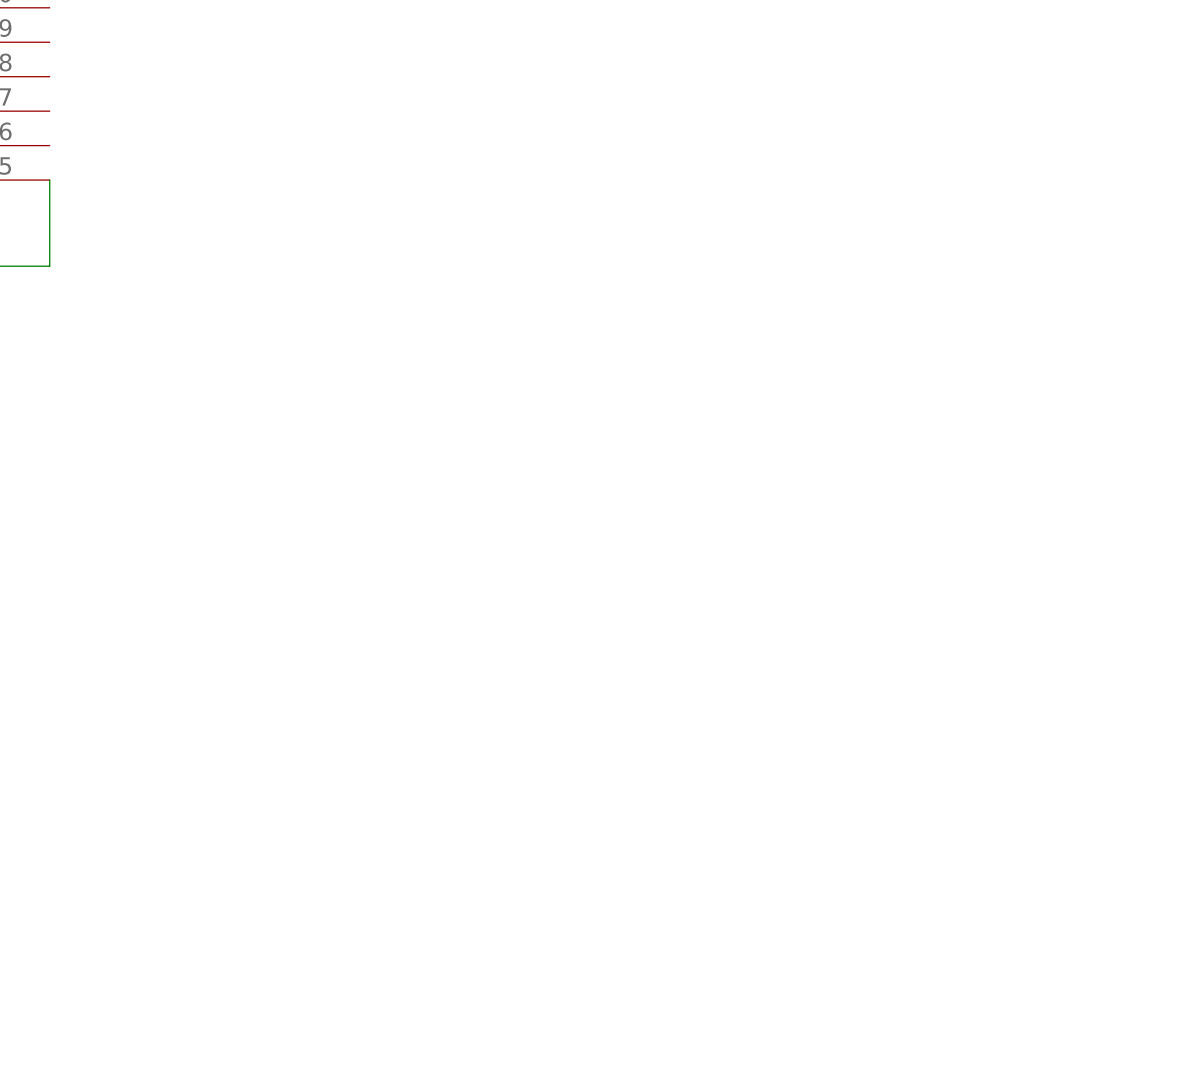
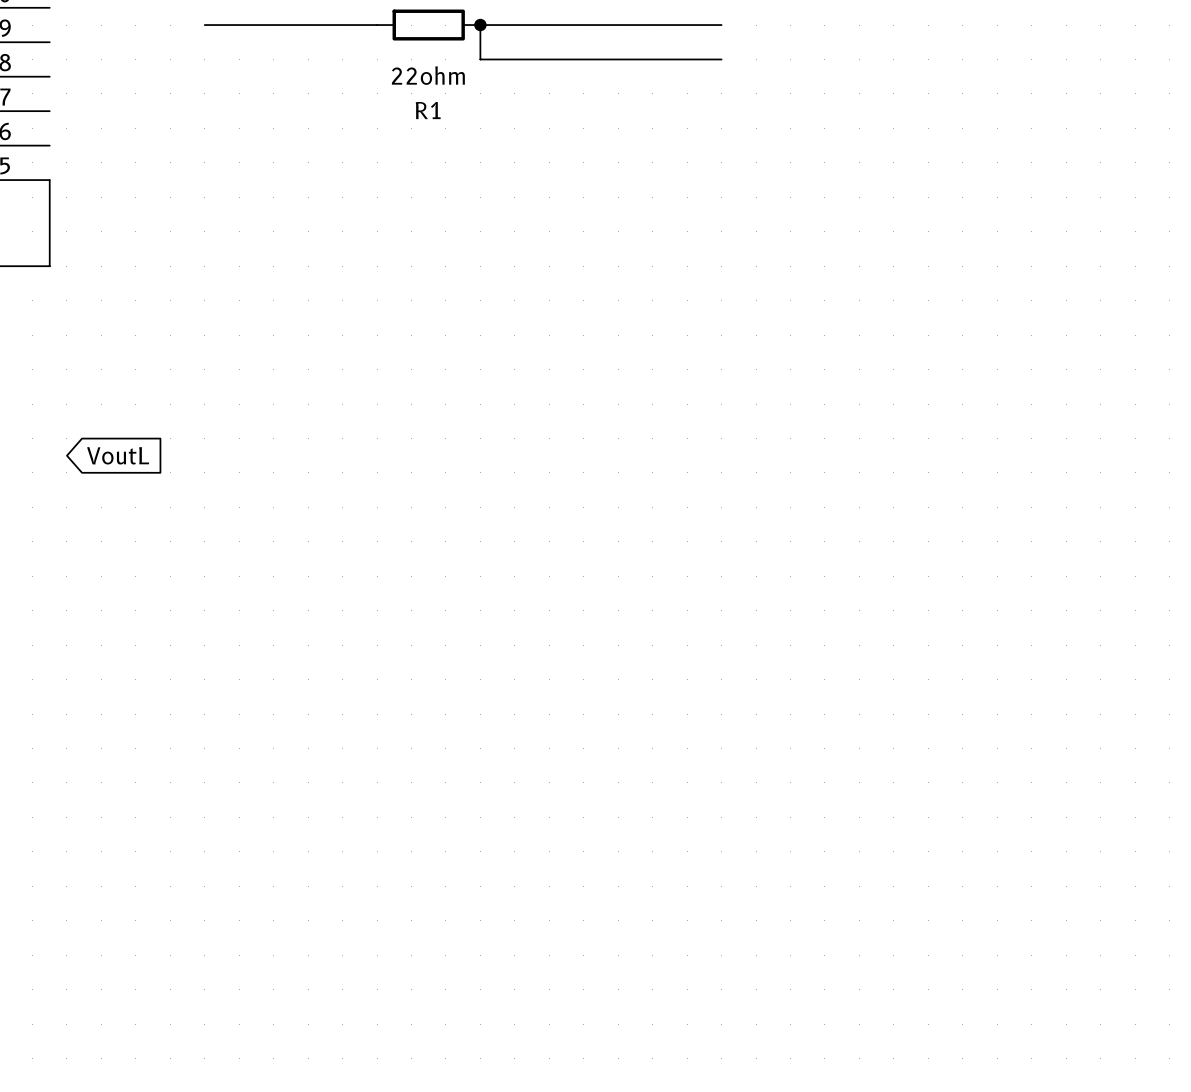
wire: none -> (204, 25) (377, 25)
R1: none -> 22ohm (428, 25)
junction: none -> (480, 25)
wire: none -> (721, 25) (480, 25) (480, 59) (721, 59)
global label: none -> VoutL (118, 455)

